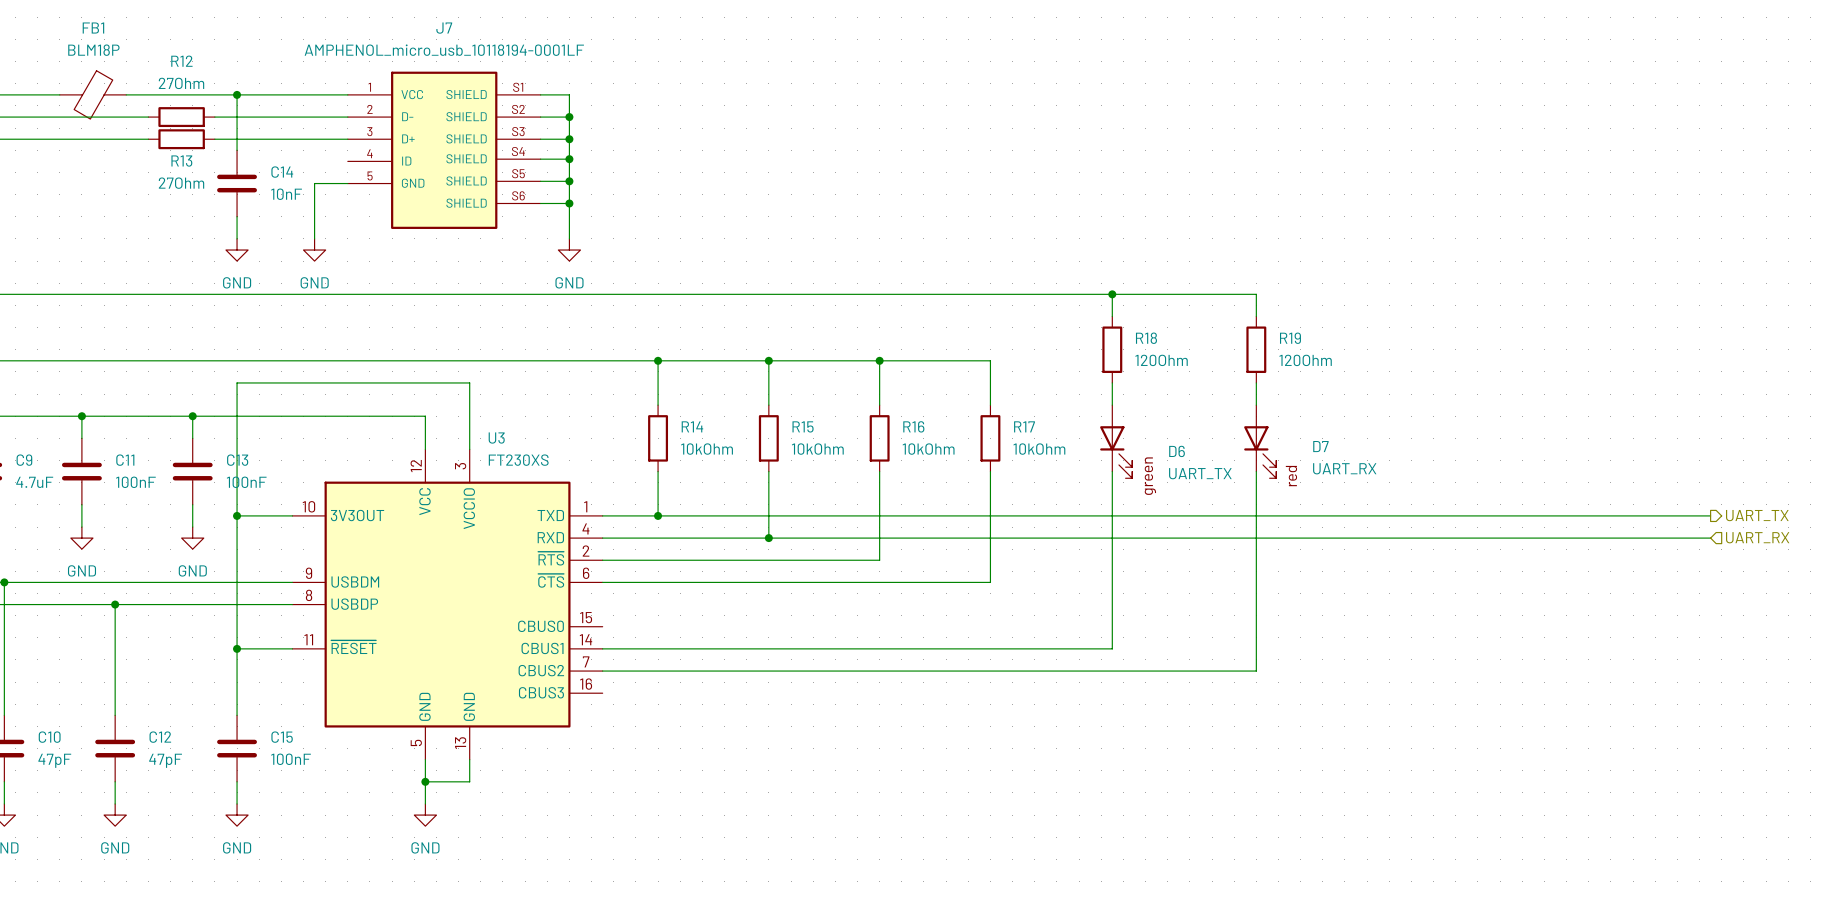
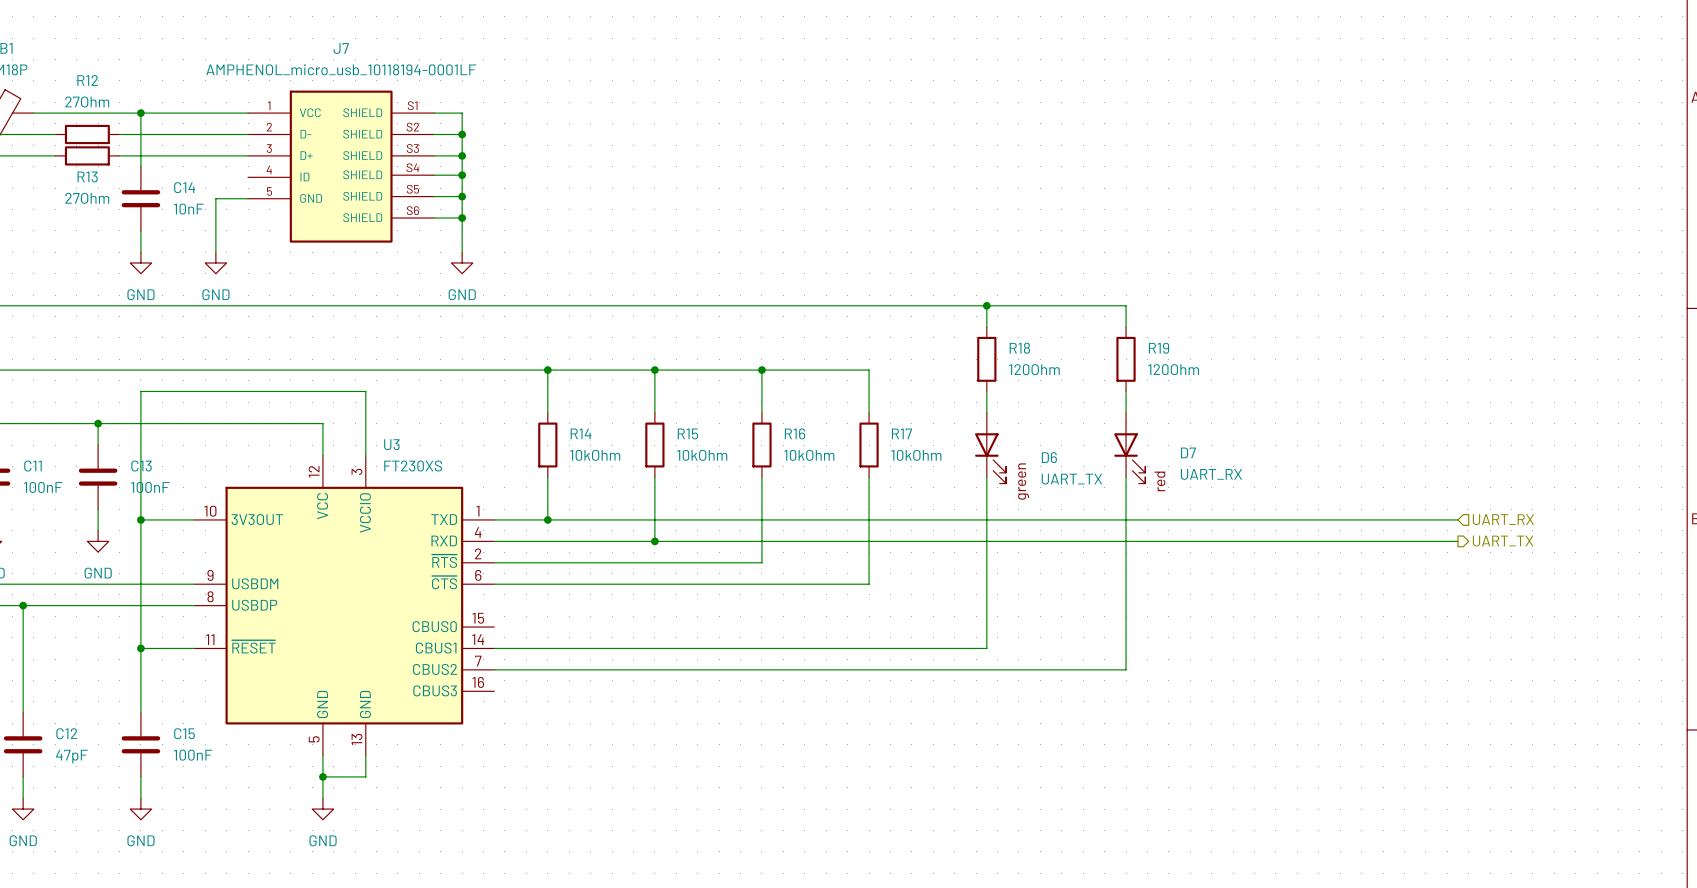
wire: (1599, 515) (1710, 515) -> none
hierarchical label position: UART_TX (1757, 515) -> UART_TX (1503, 541)
hierarchical label position: UART_RX (1757, 537) -> UART_RX (1503, 519)
wire: (1599, 538) (1710, 538) -> none

